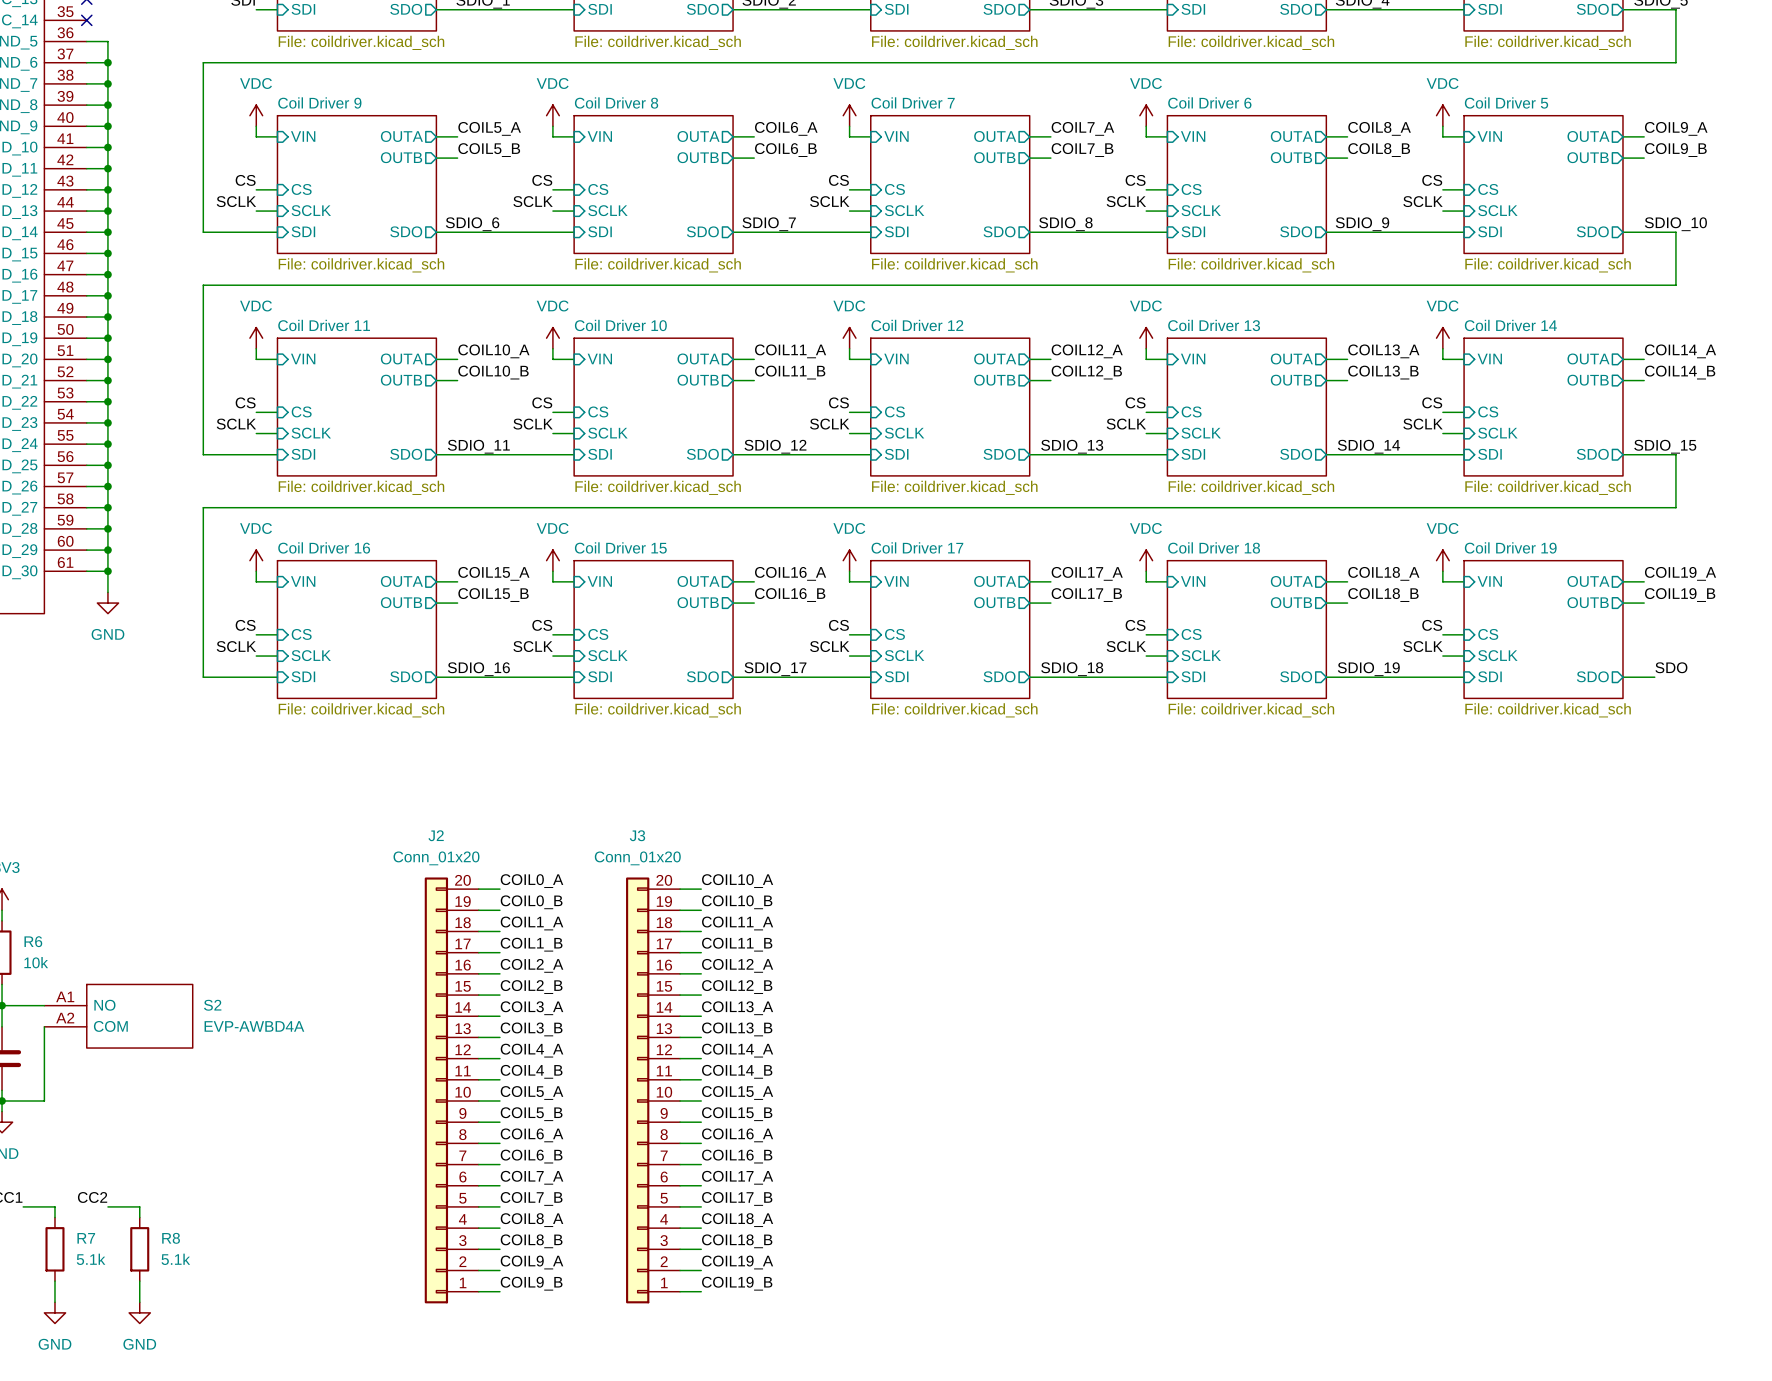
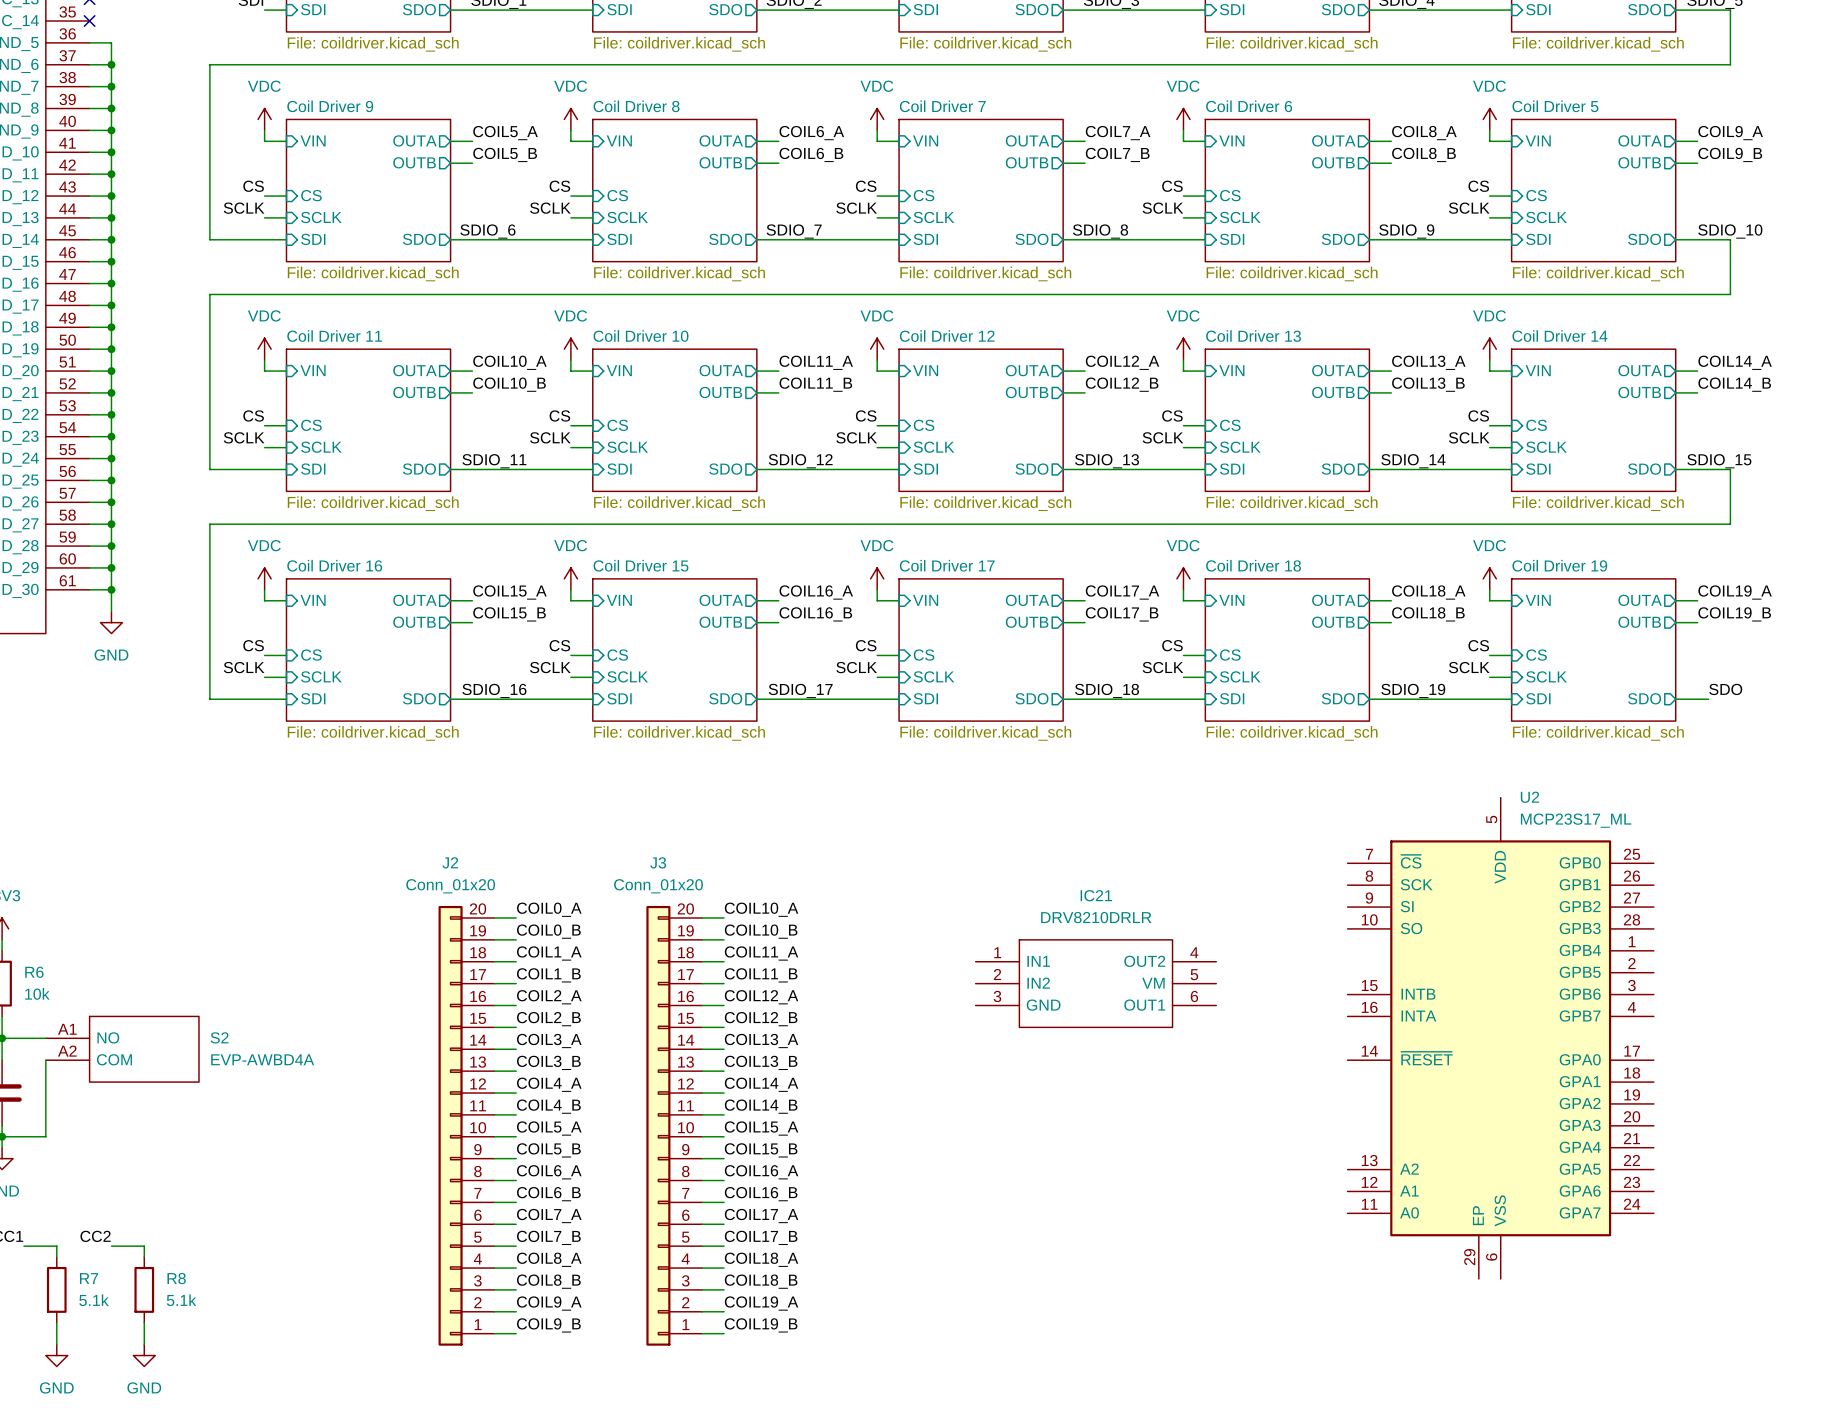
IC21: none -> DRV8210DRLR (1095, 983)
U2: none -> MCP23S17_ML (1500, 1038)

